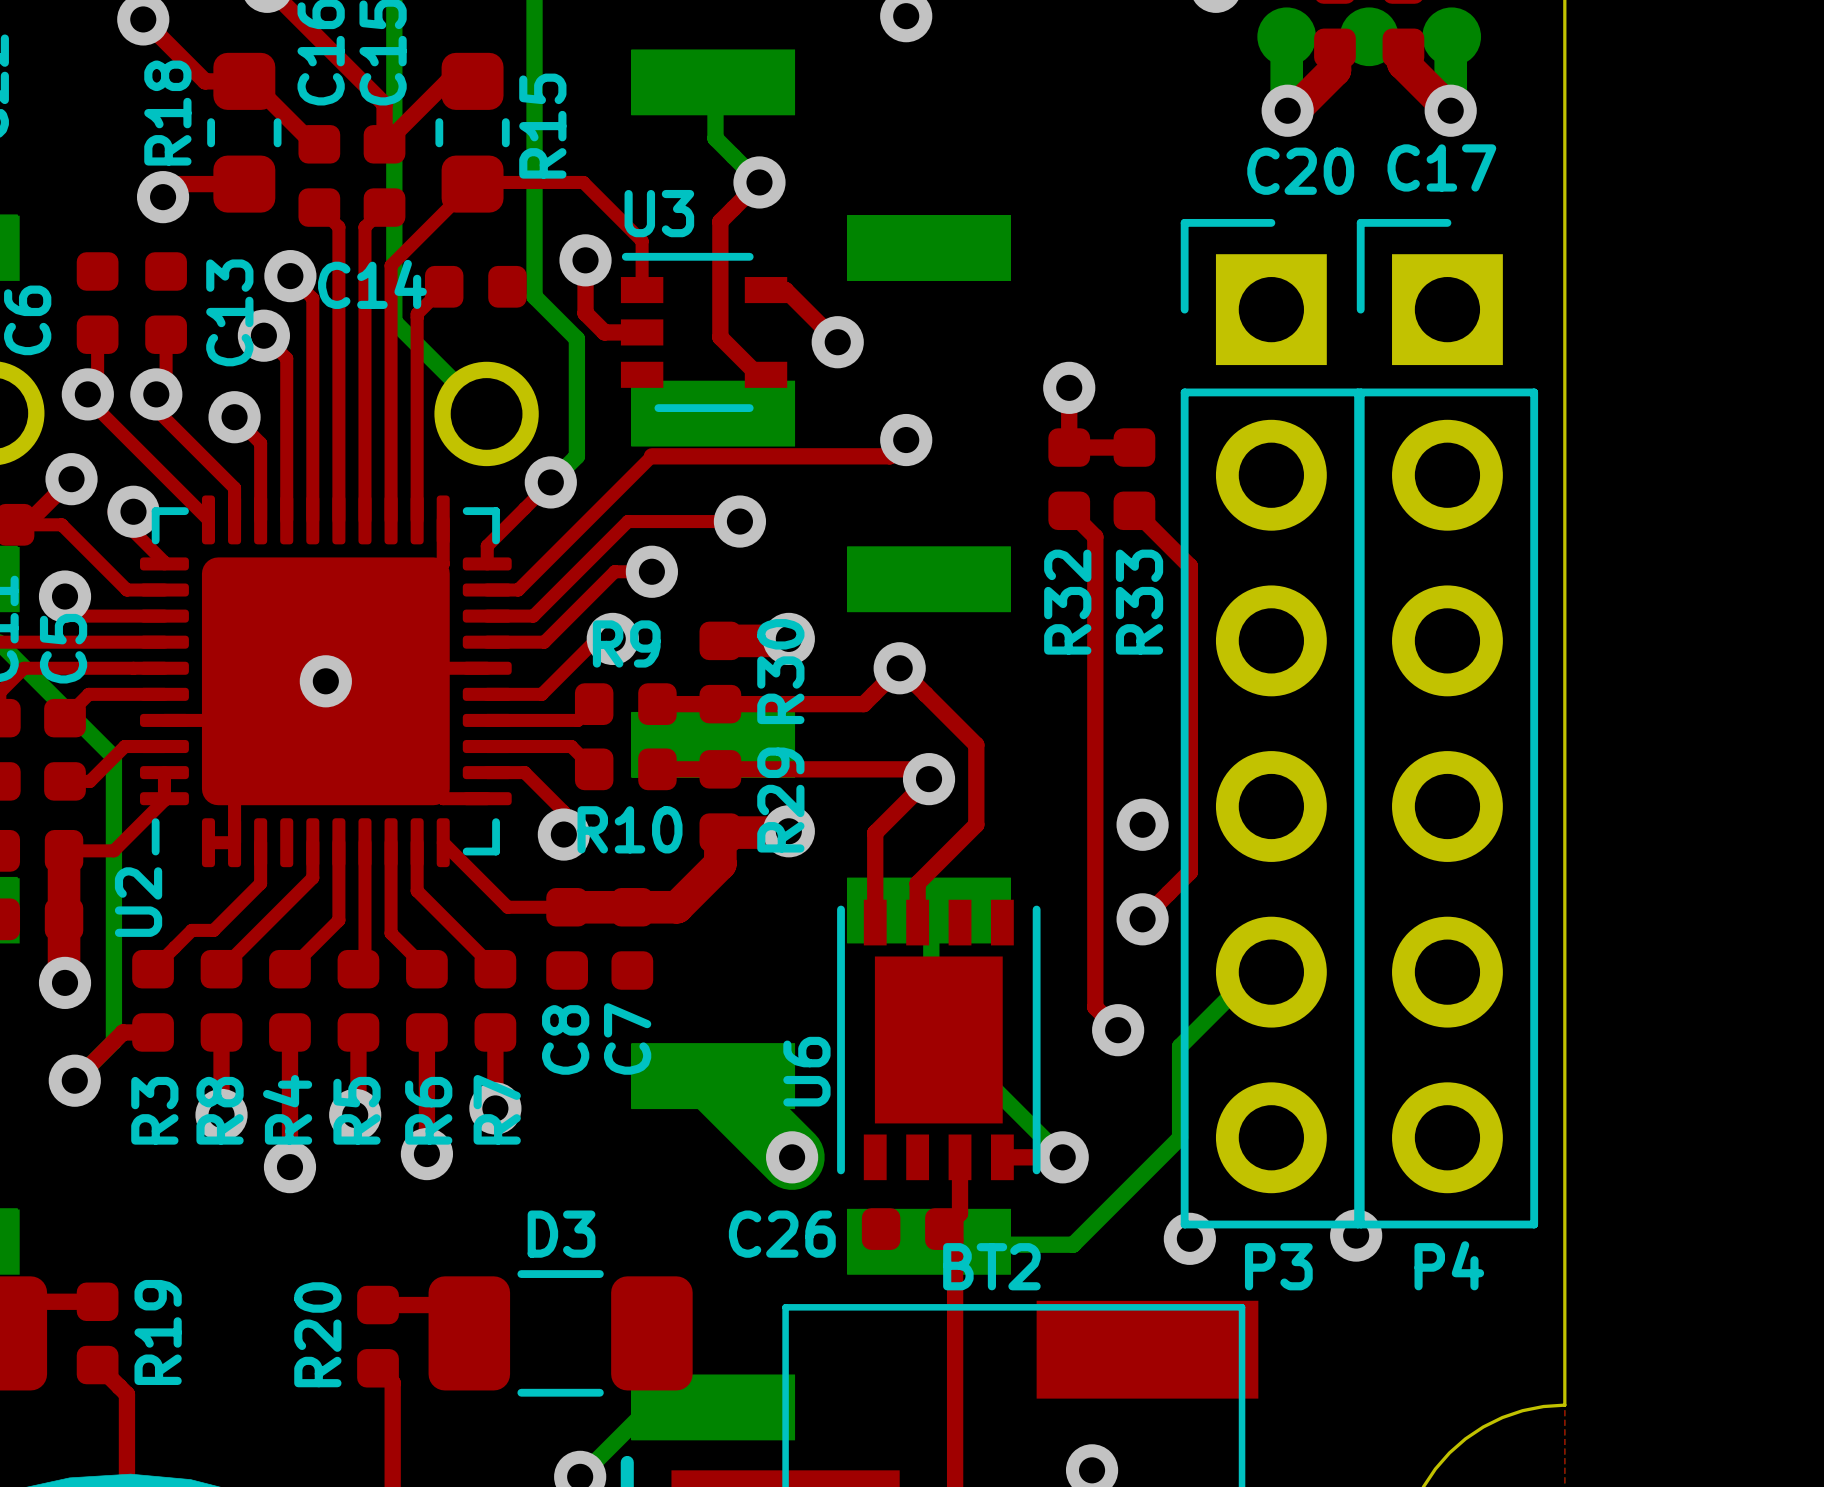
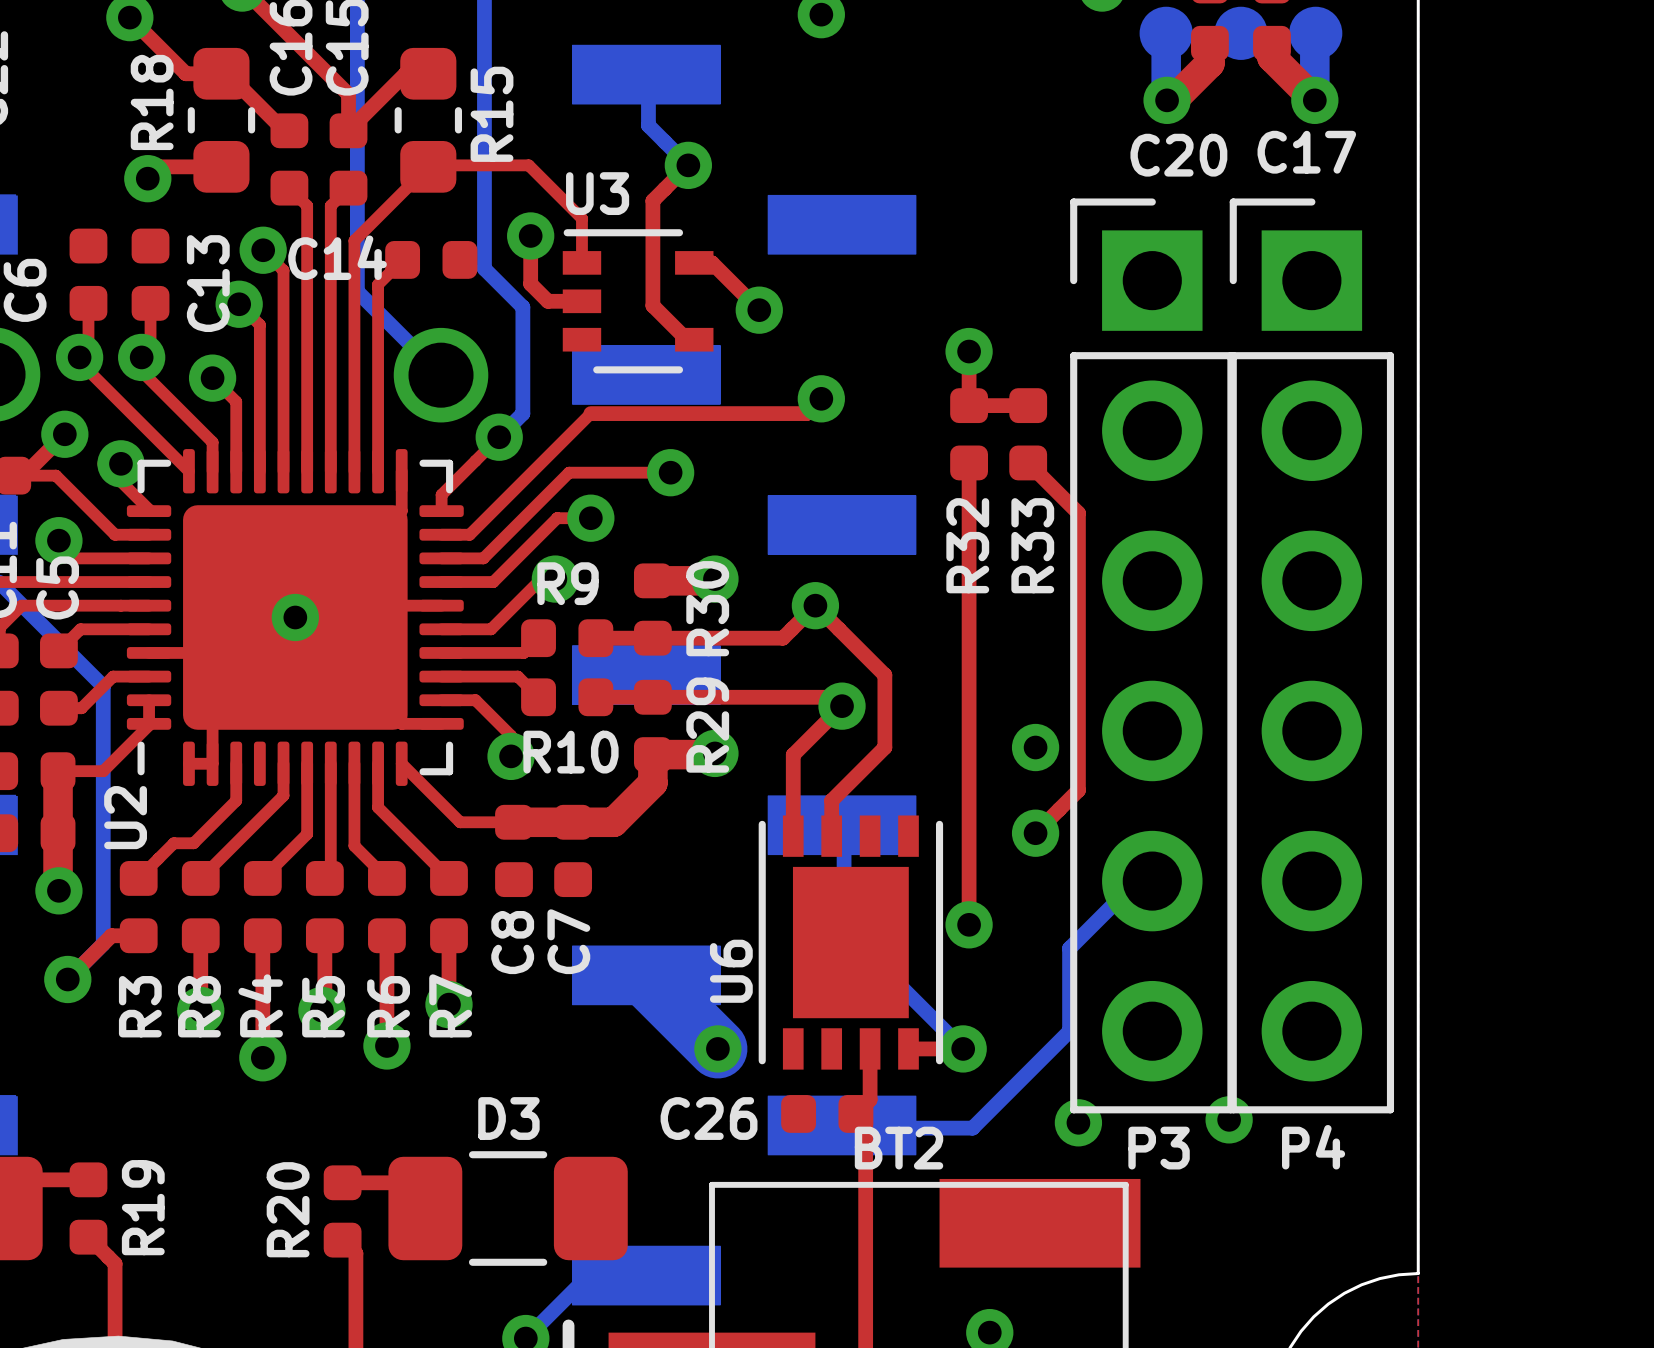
top track: (1069, 510) (1095, 536) (1095, 1007) (1118, 1030) -> (969, 462) (969, 924)
via position: (1118, 1030) -> (969, 924)

